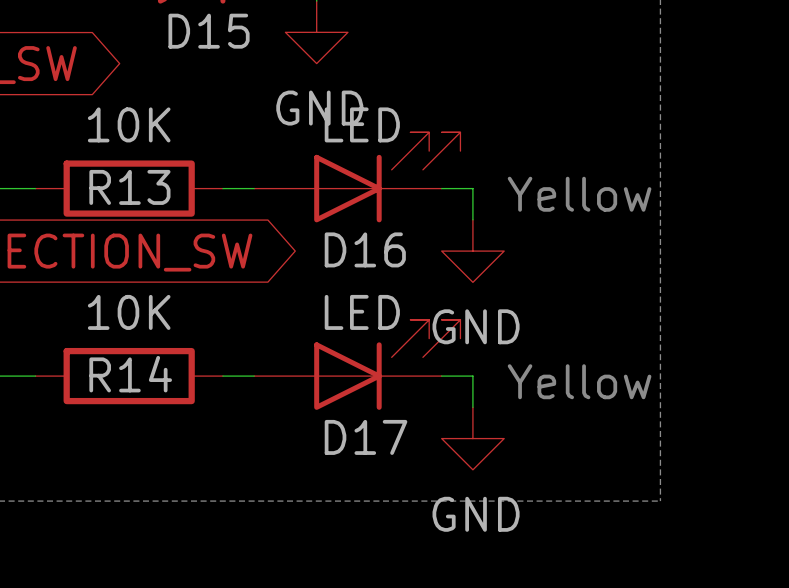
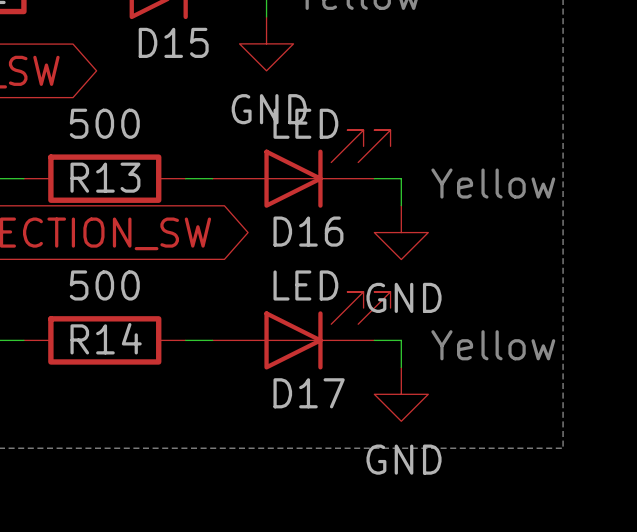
R13 value: 10K (129, 124) -> 500 (104, 123)
R14 value: 10K (129, 312) -> 500 (104, 285)

